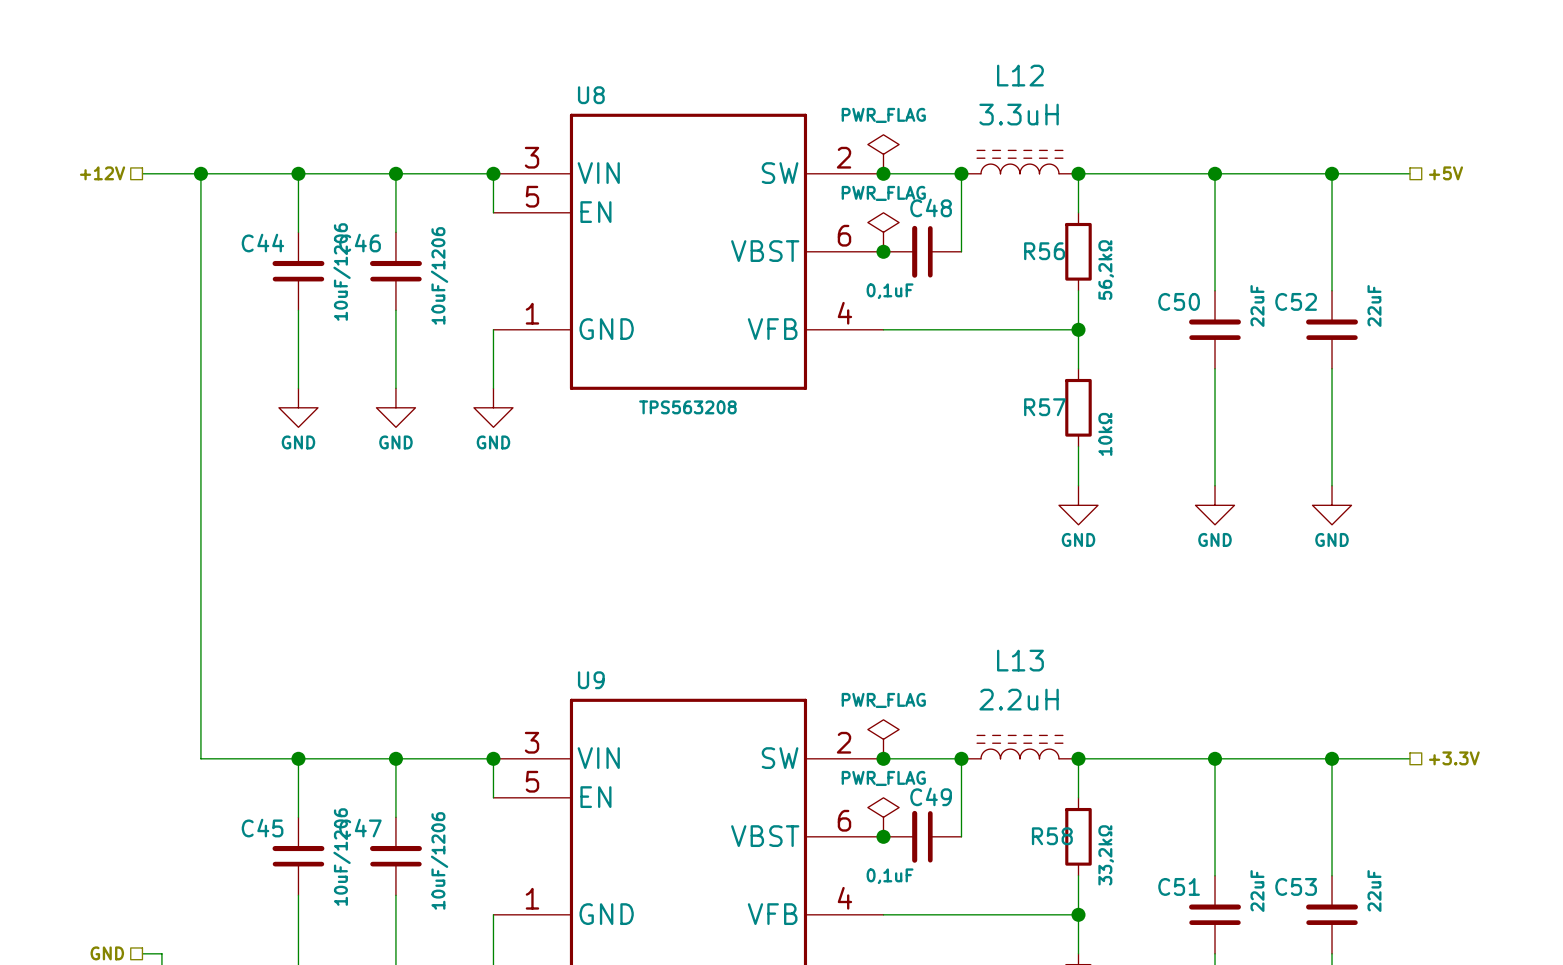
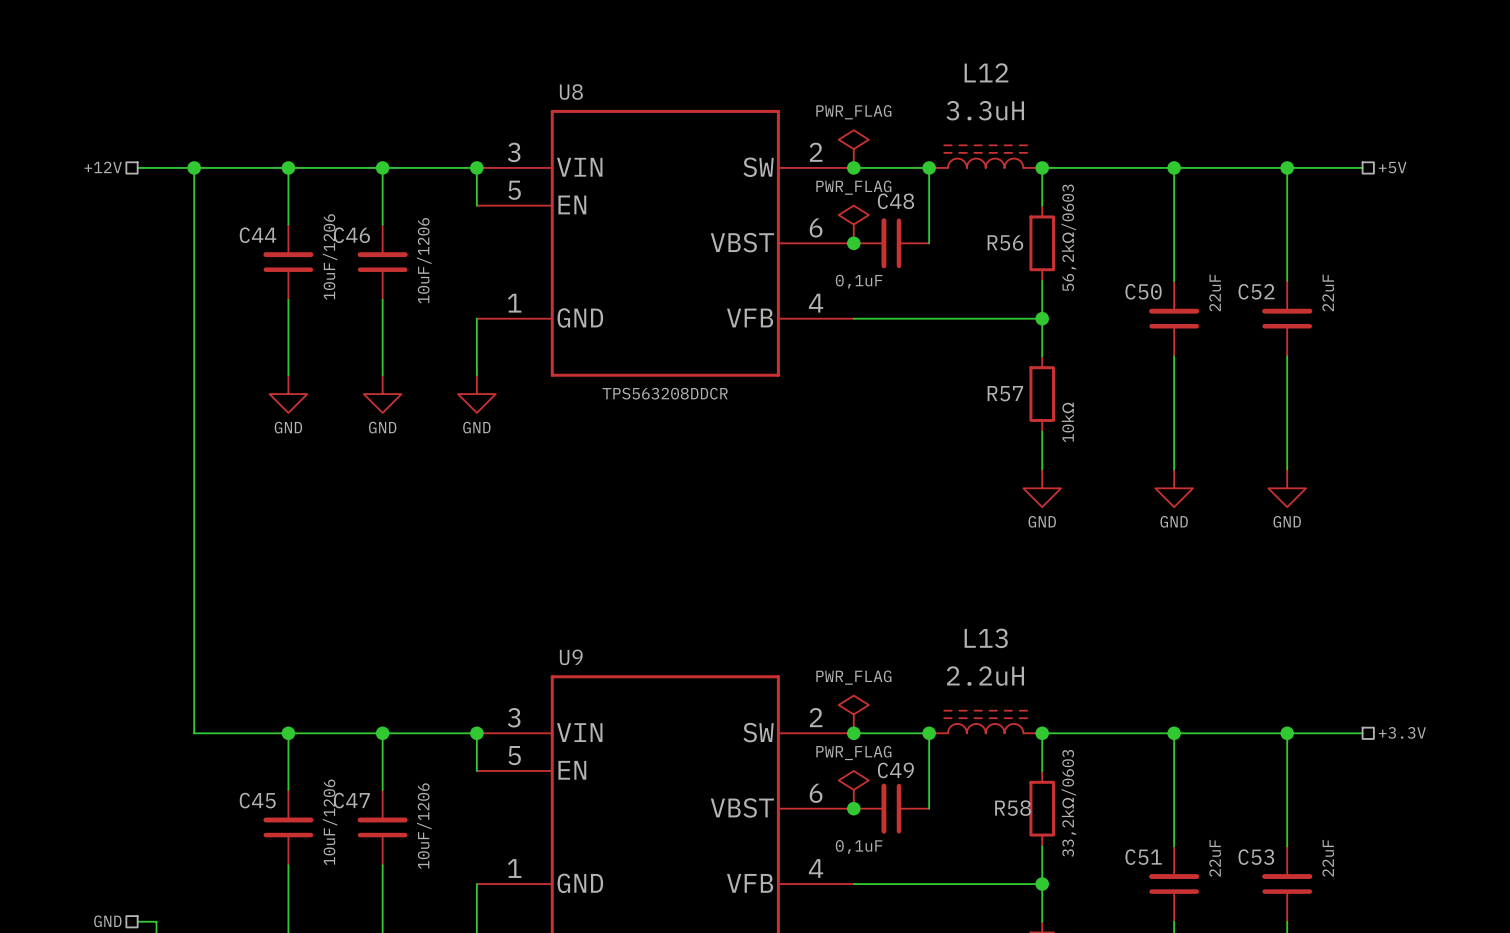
R56 value: 56,2kΩ (1106, 270) -> 56,2kΩ/0603 (1068, 237)
U8 value: TPS563208 (687, 407) -> TPS563208DDCR (665, 393)
R58 value: 33,2kΩ (1106, 855) -> 33,2kΩ/0603 (1068, 803)

